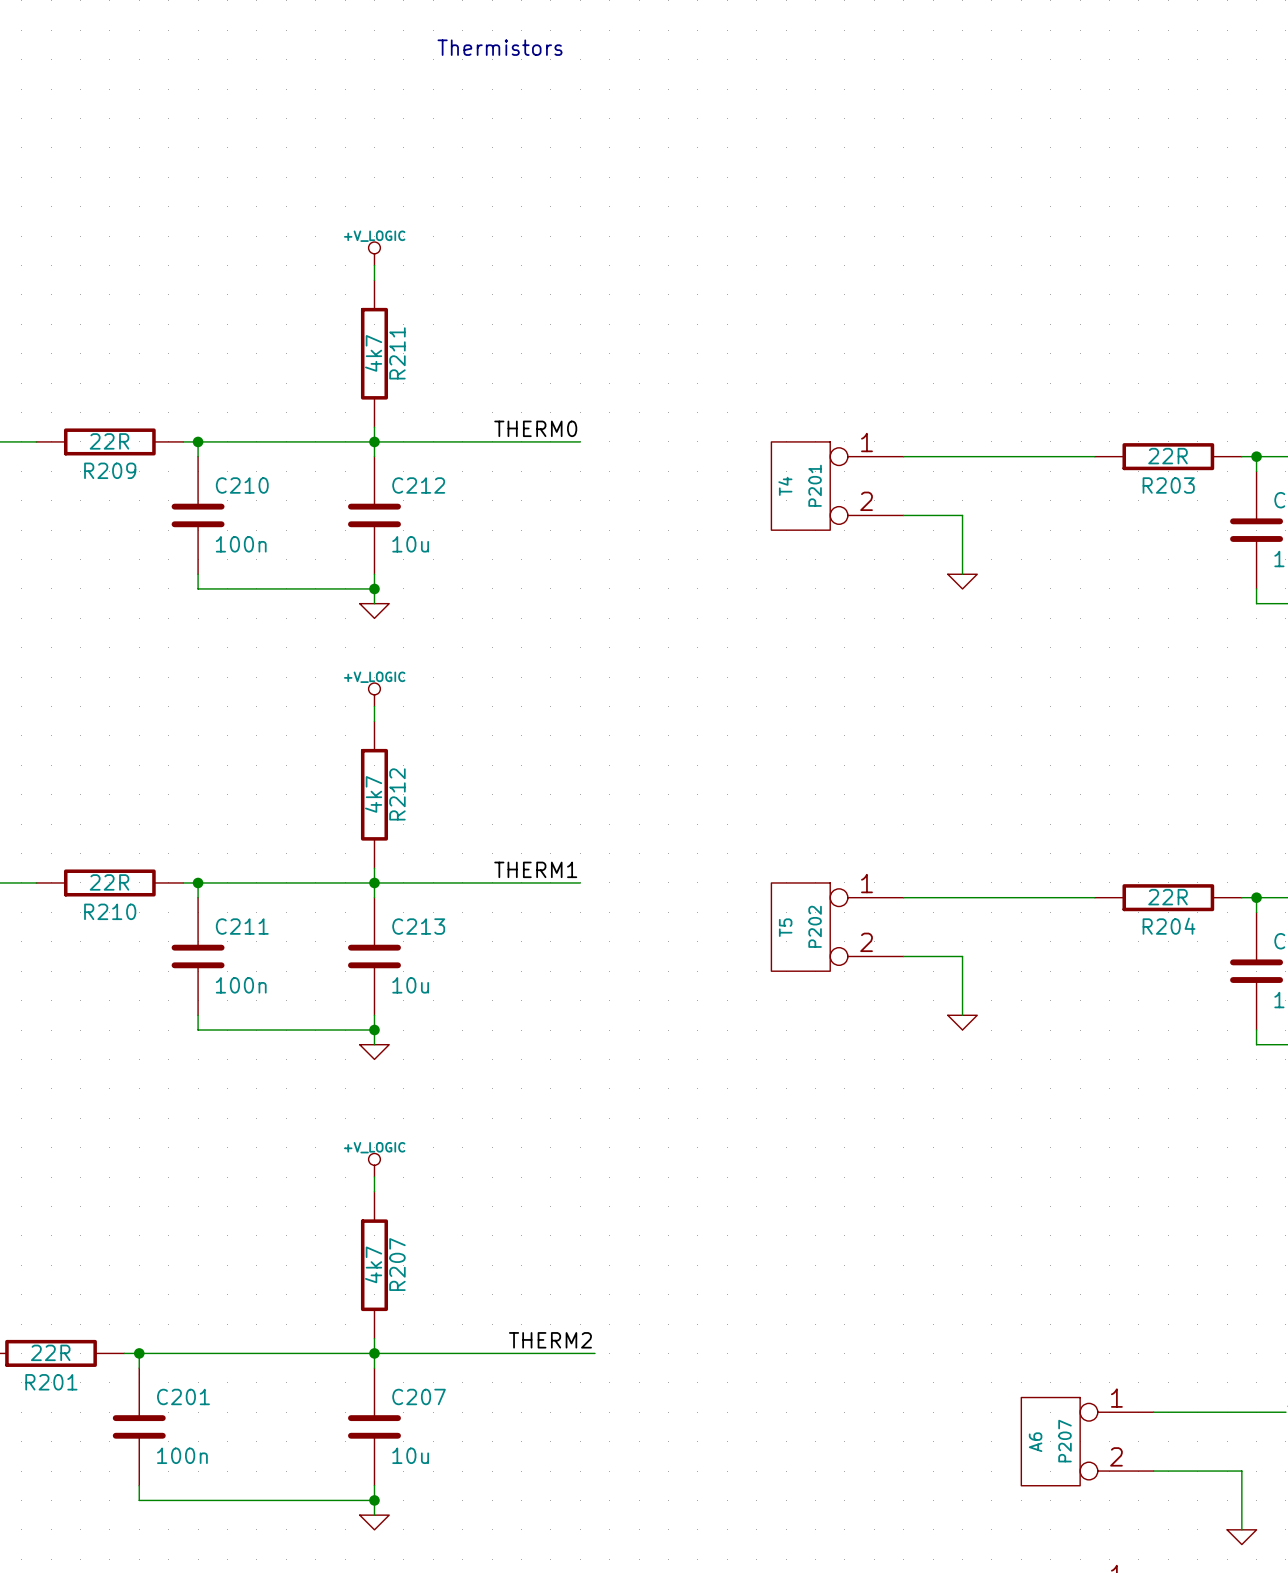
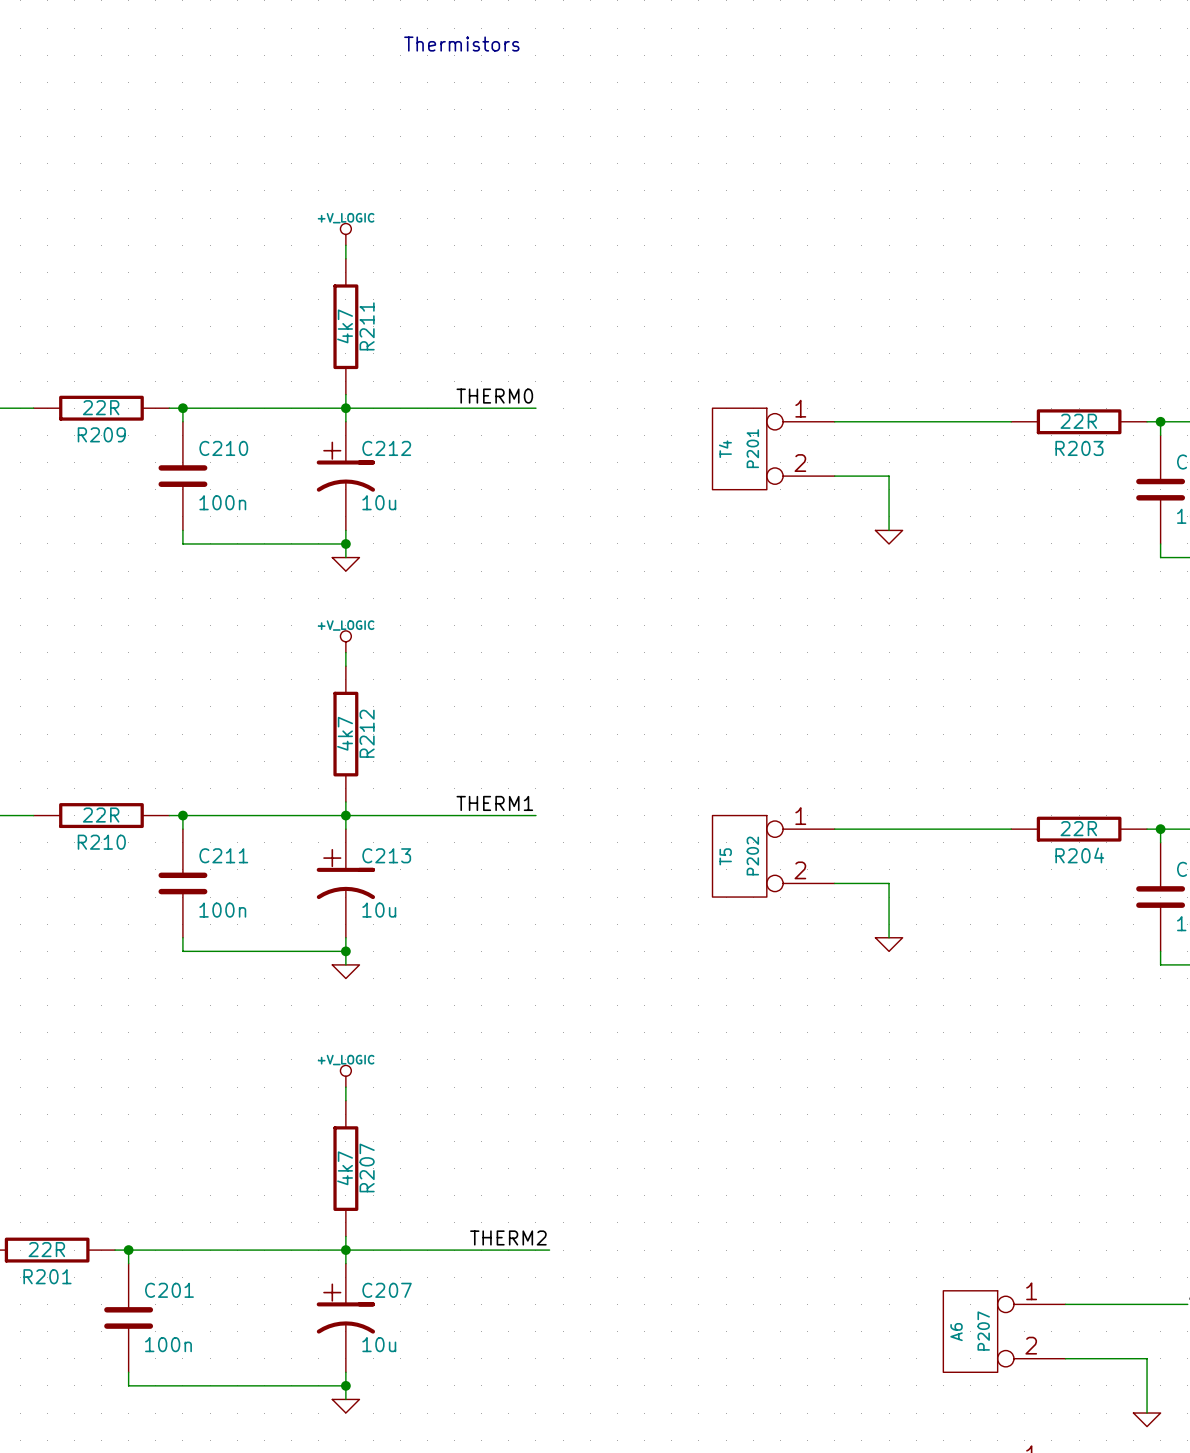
C212 symbol: [348, 456, 401, 575] -> [316, 421, 376, 531]
C213 symbol: [348, 897, 401, 1016] -> [316, 829, 376, 938]
C207 symbol: [348, 1368, 401, 1486] -> [316, 1263, 376, 1373]

